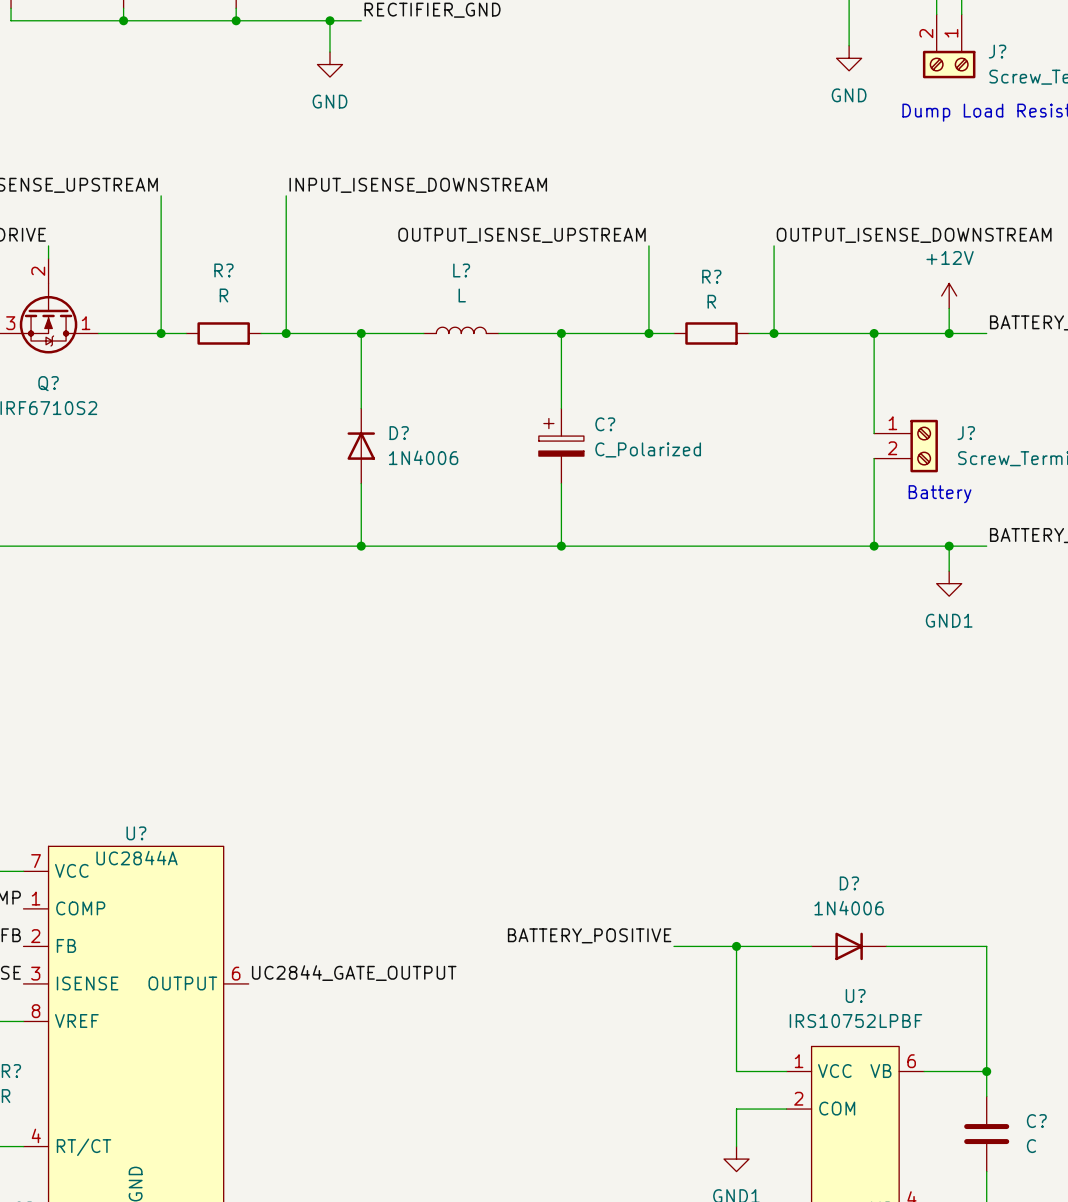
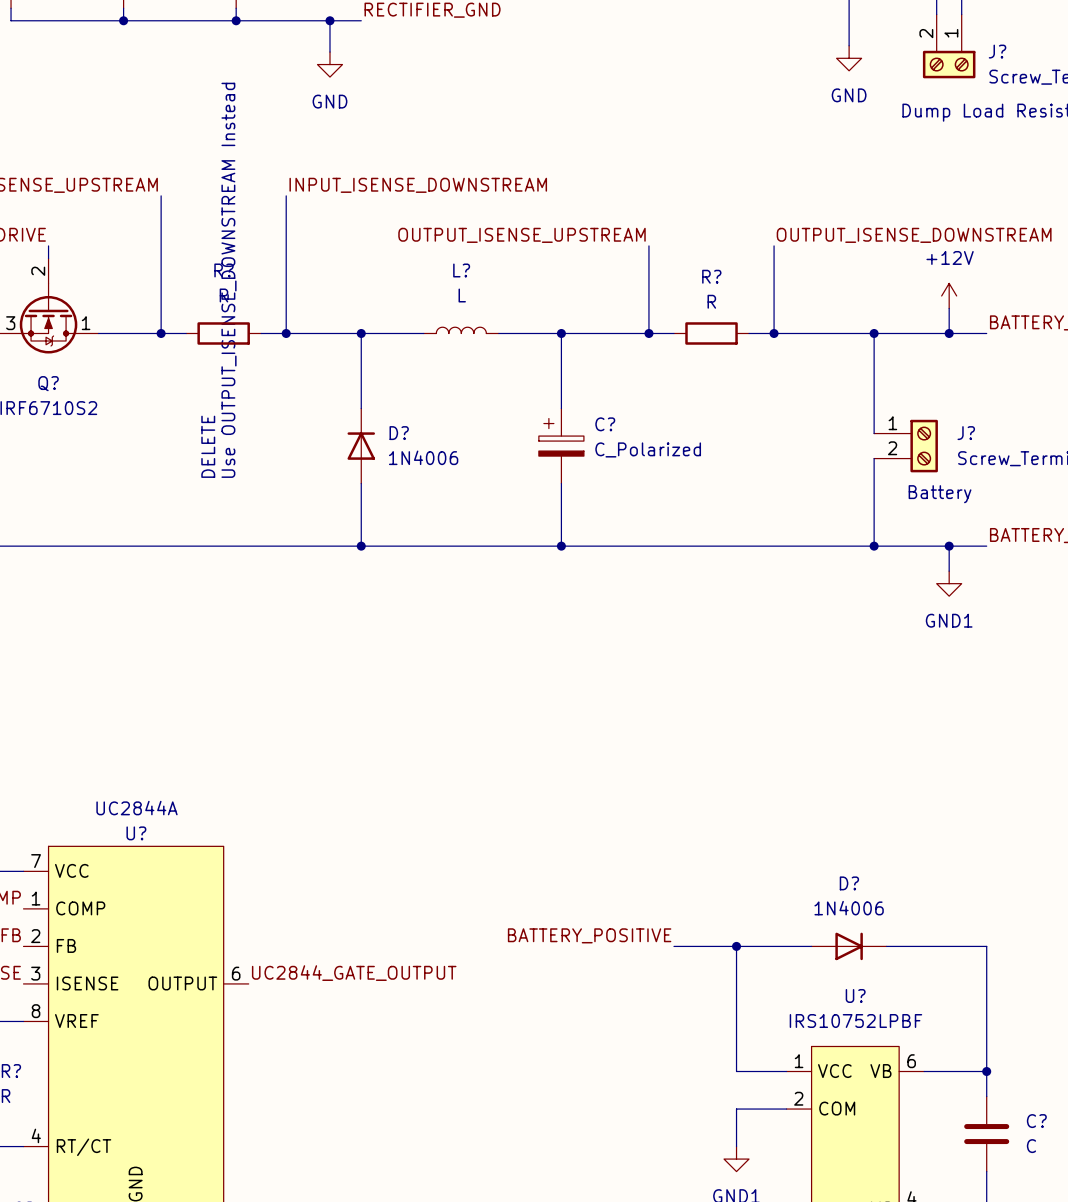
text: none -> Use OUTPUT_ISENSE_DOWNSTREAM Instead (228, 280)
text: none -> DELETE (208, 446)
U? value position: UC2844A (137, 858) -> UC2844A (137, 808)

